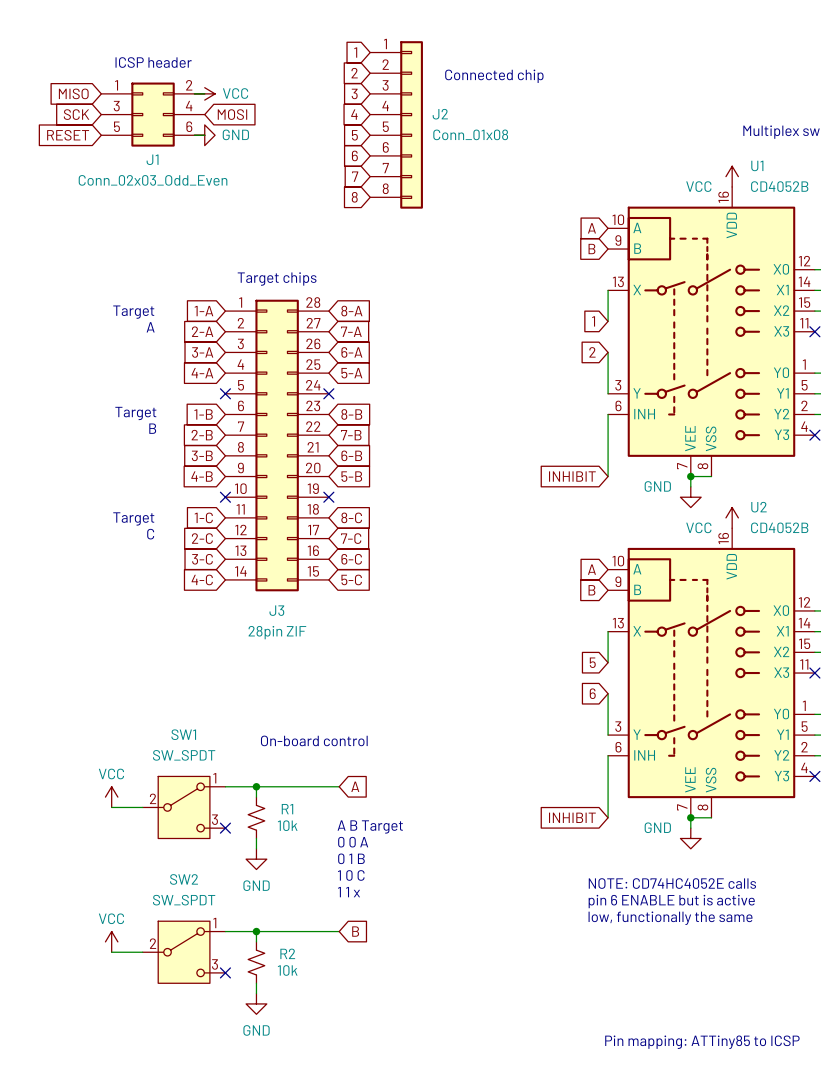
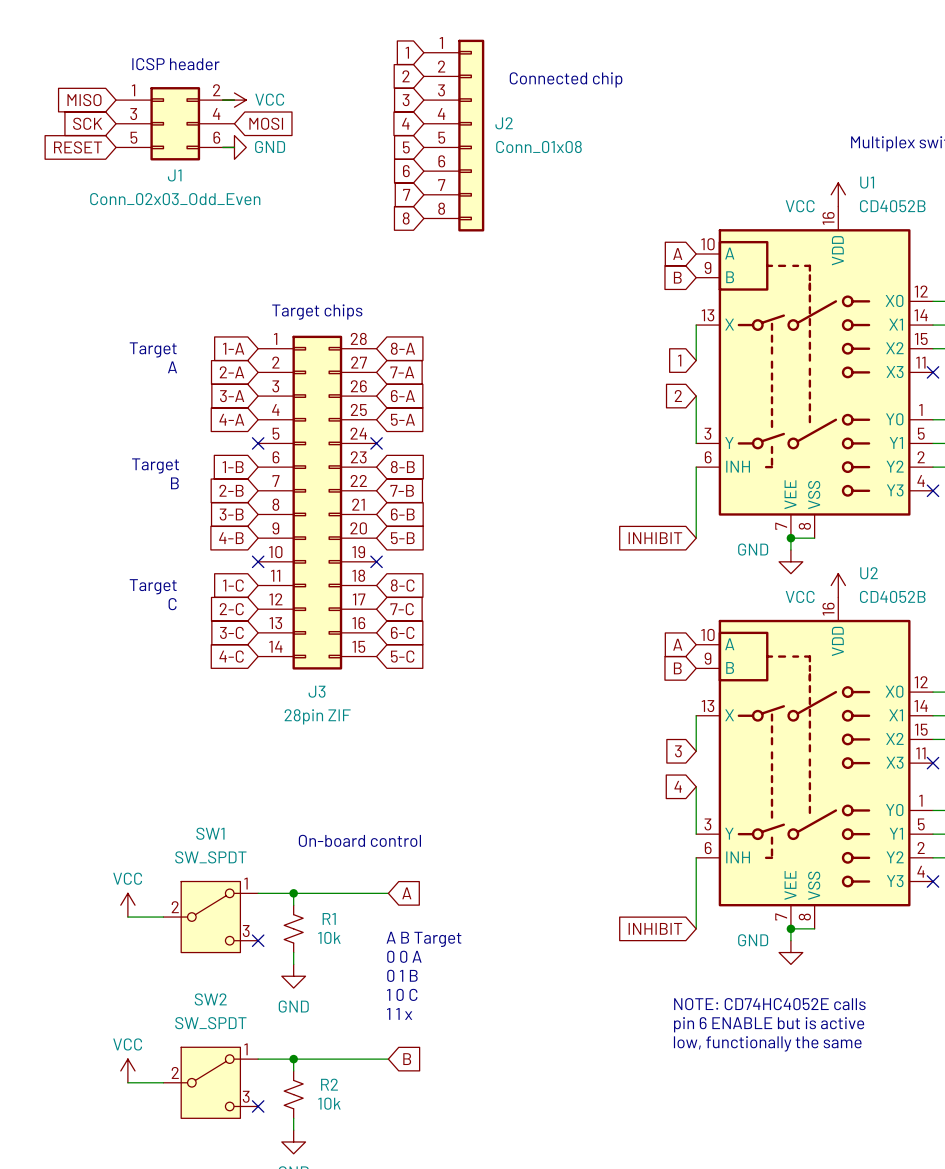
global label: 5 (592, 662) -> 3 (678, 751)
global label: 6 (592, 693) -> 4 (678, 786)

